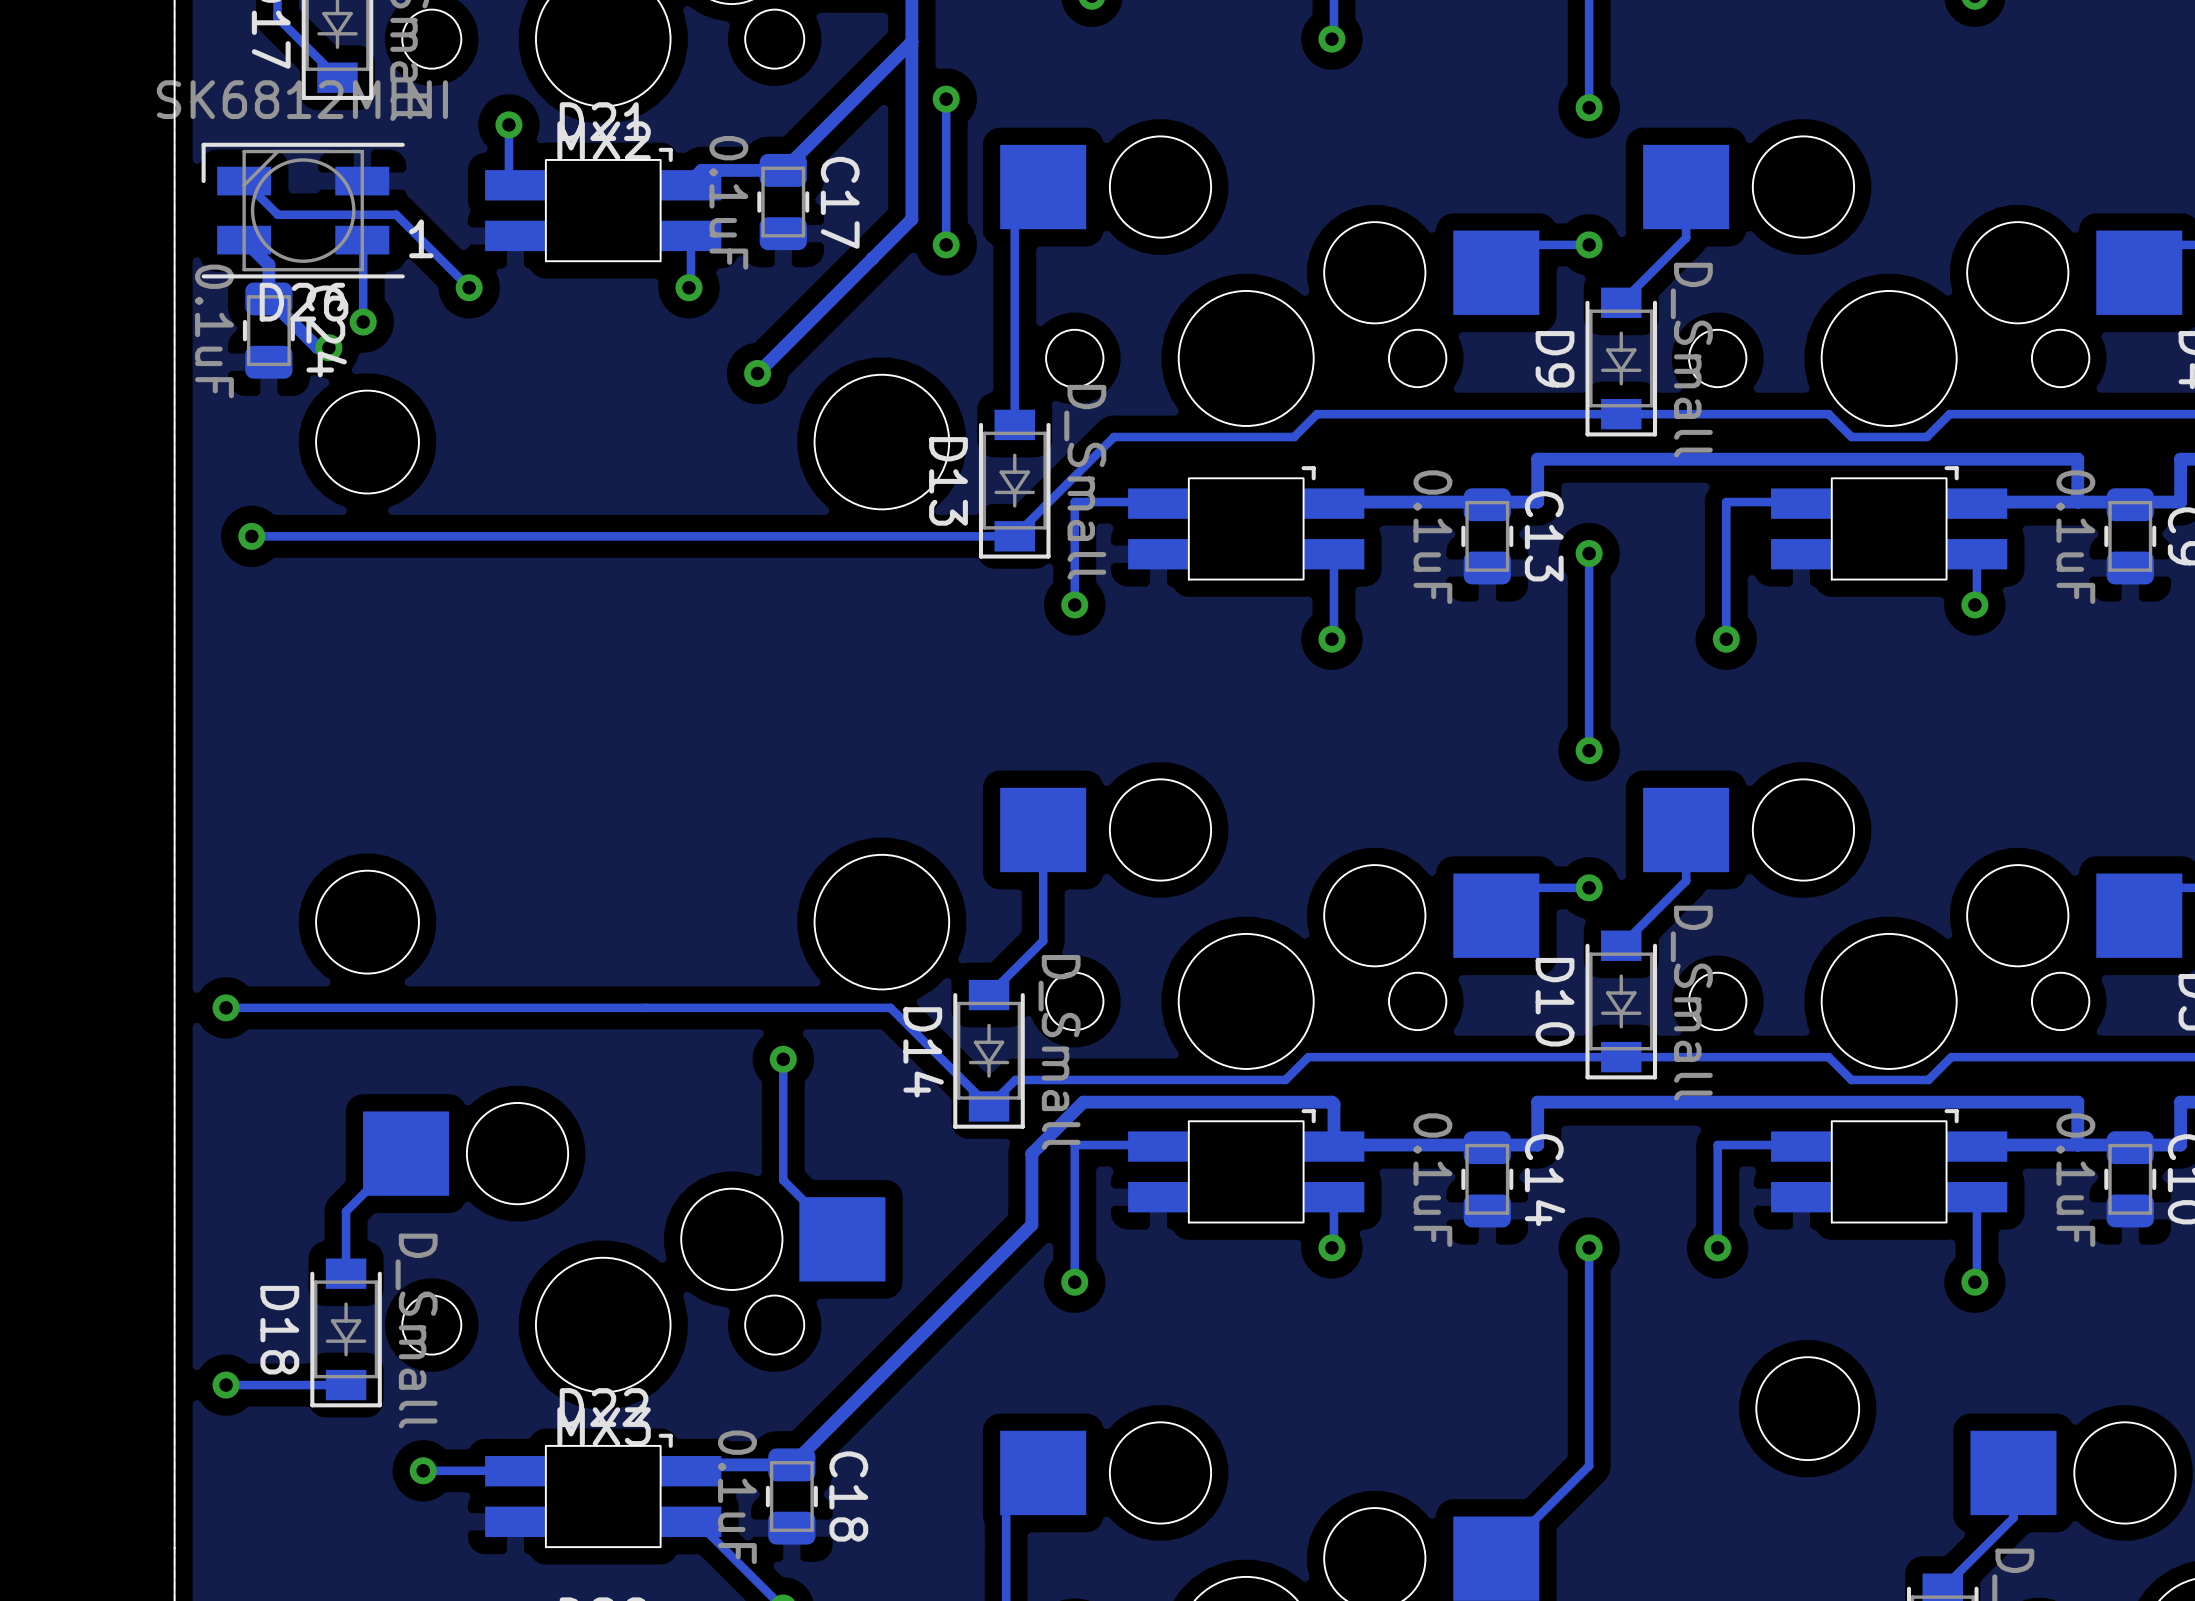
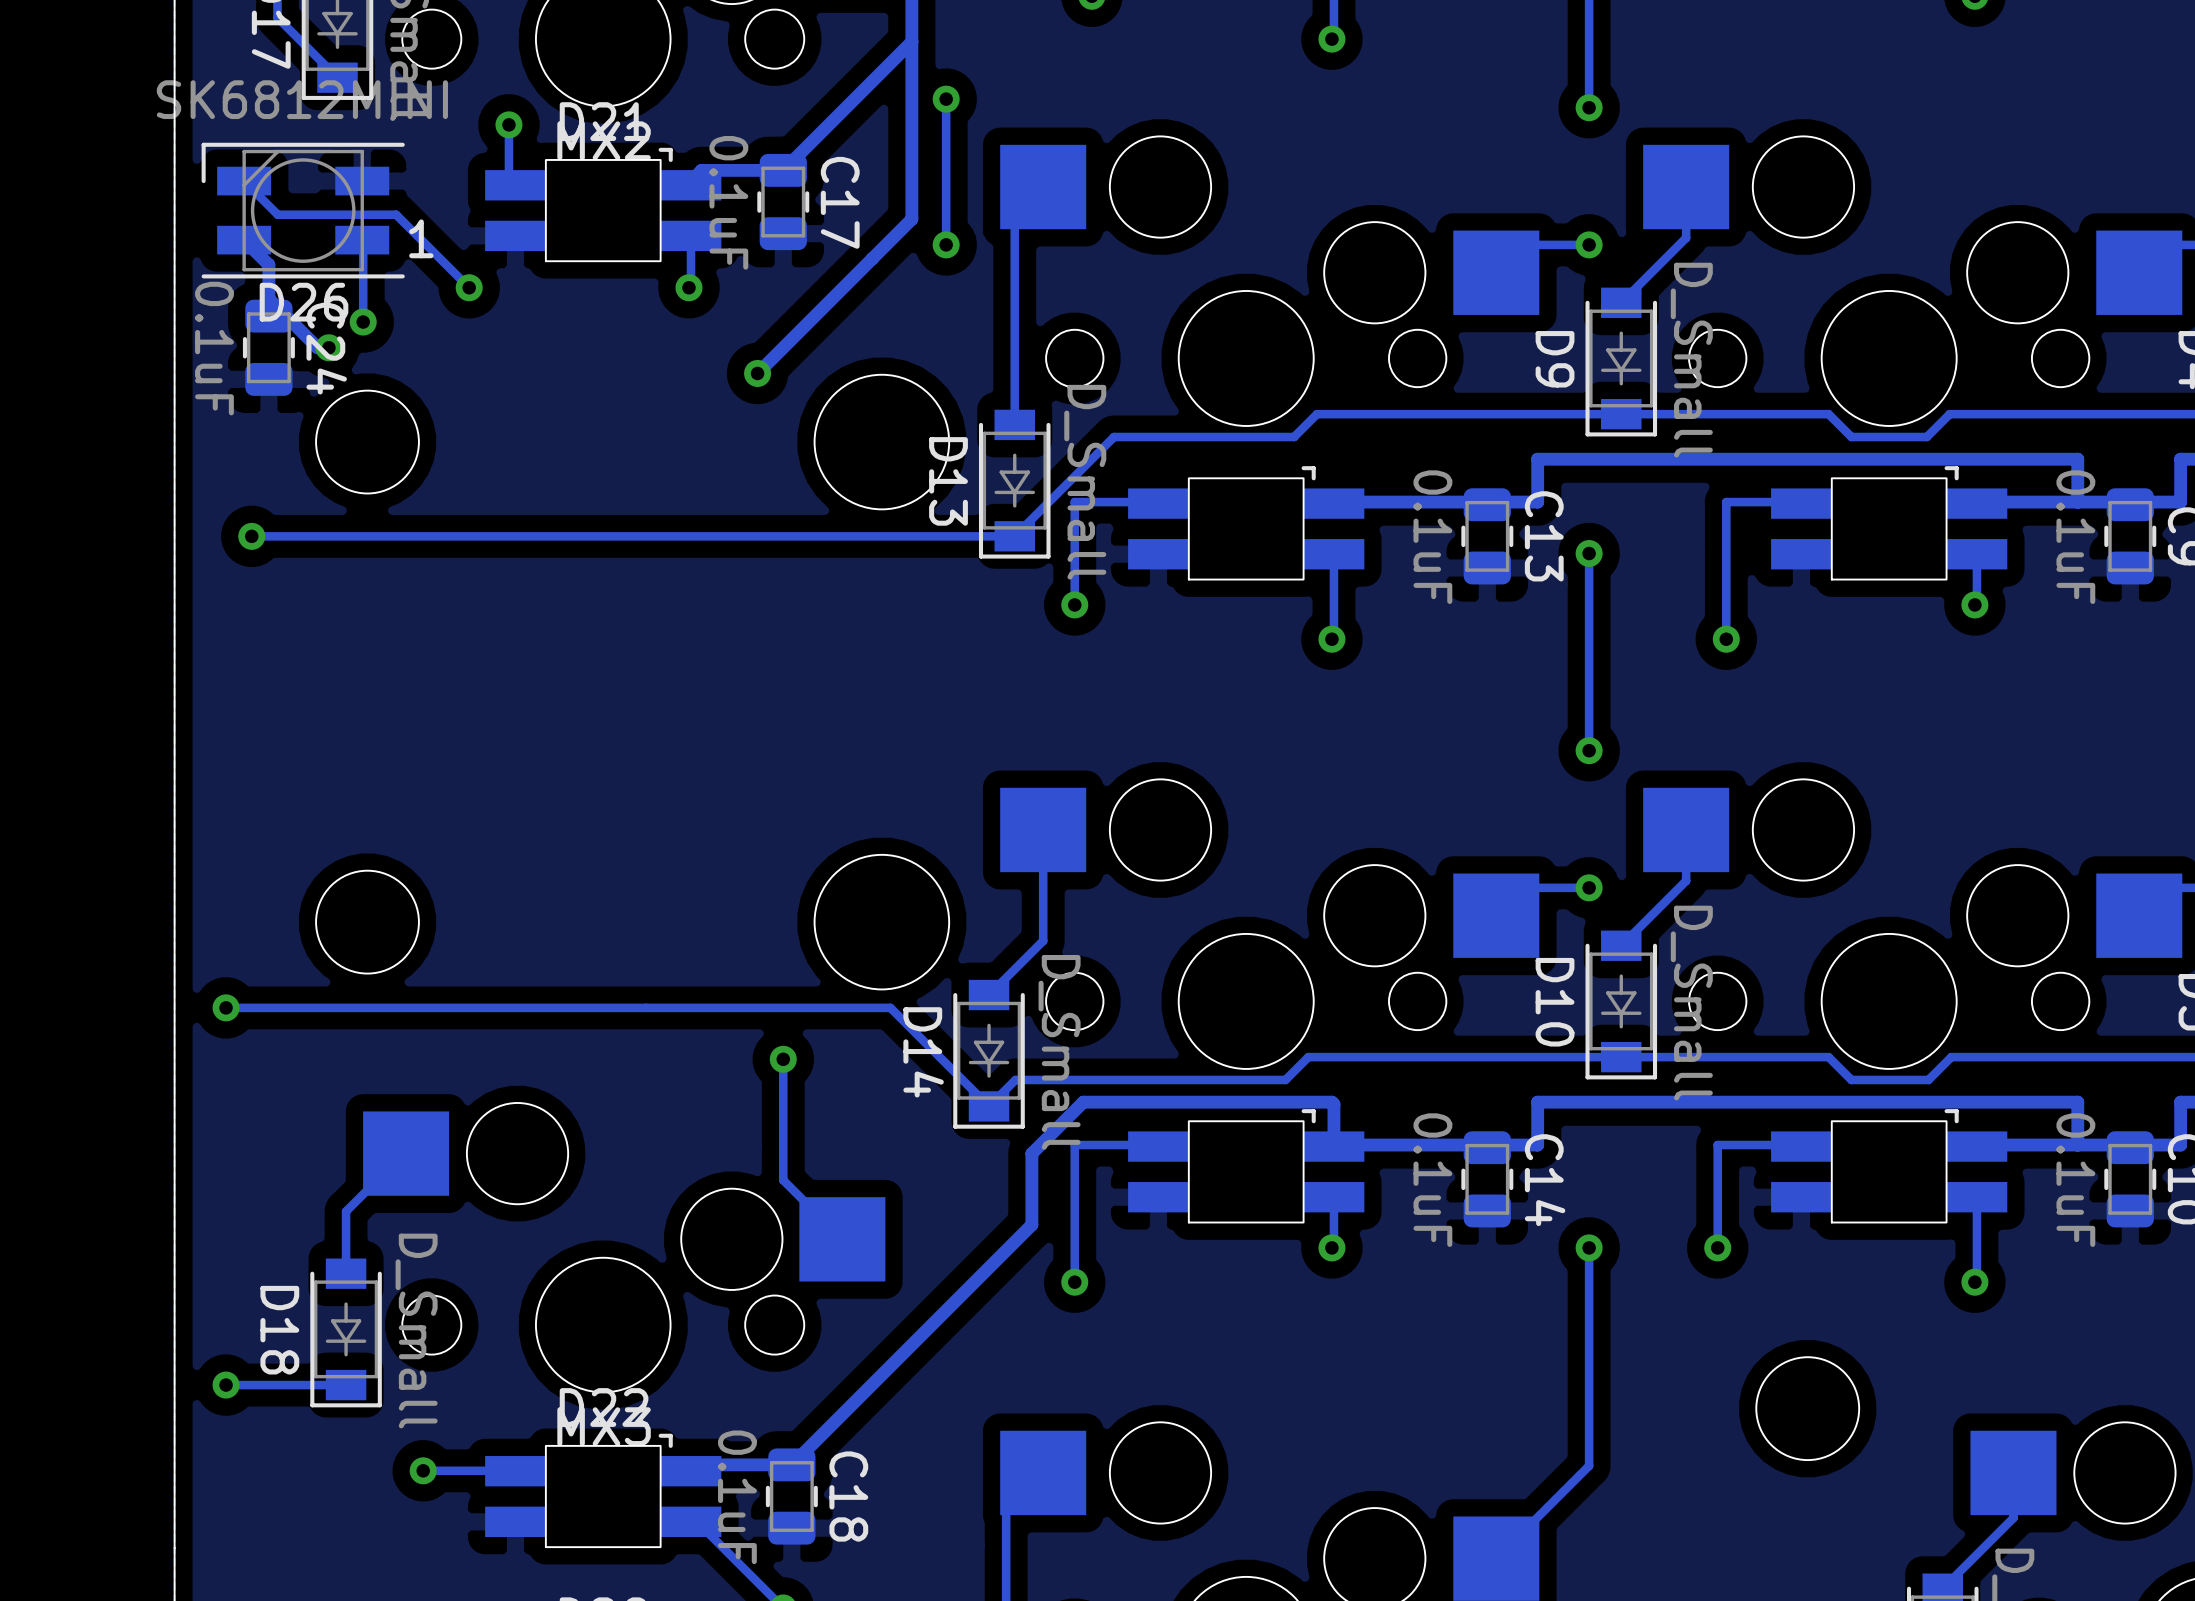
C24 position: (268, 330) -> (268, 347)

